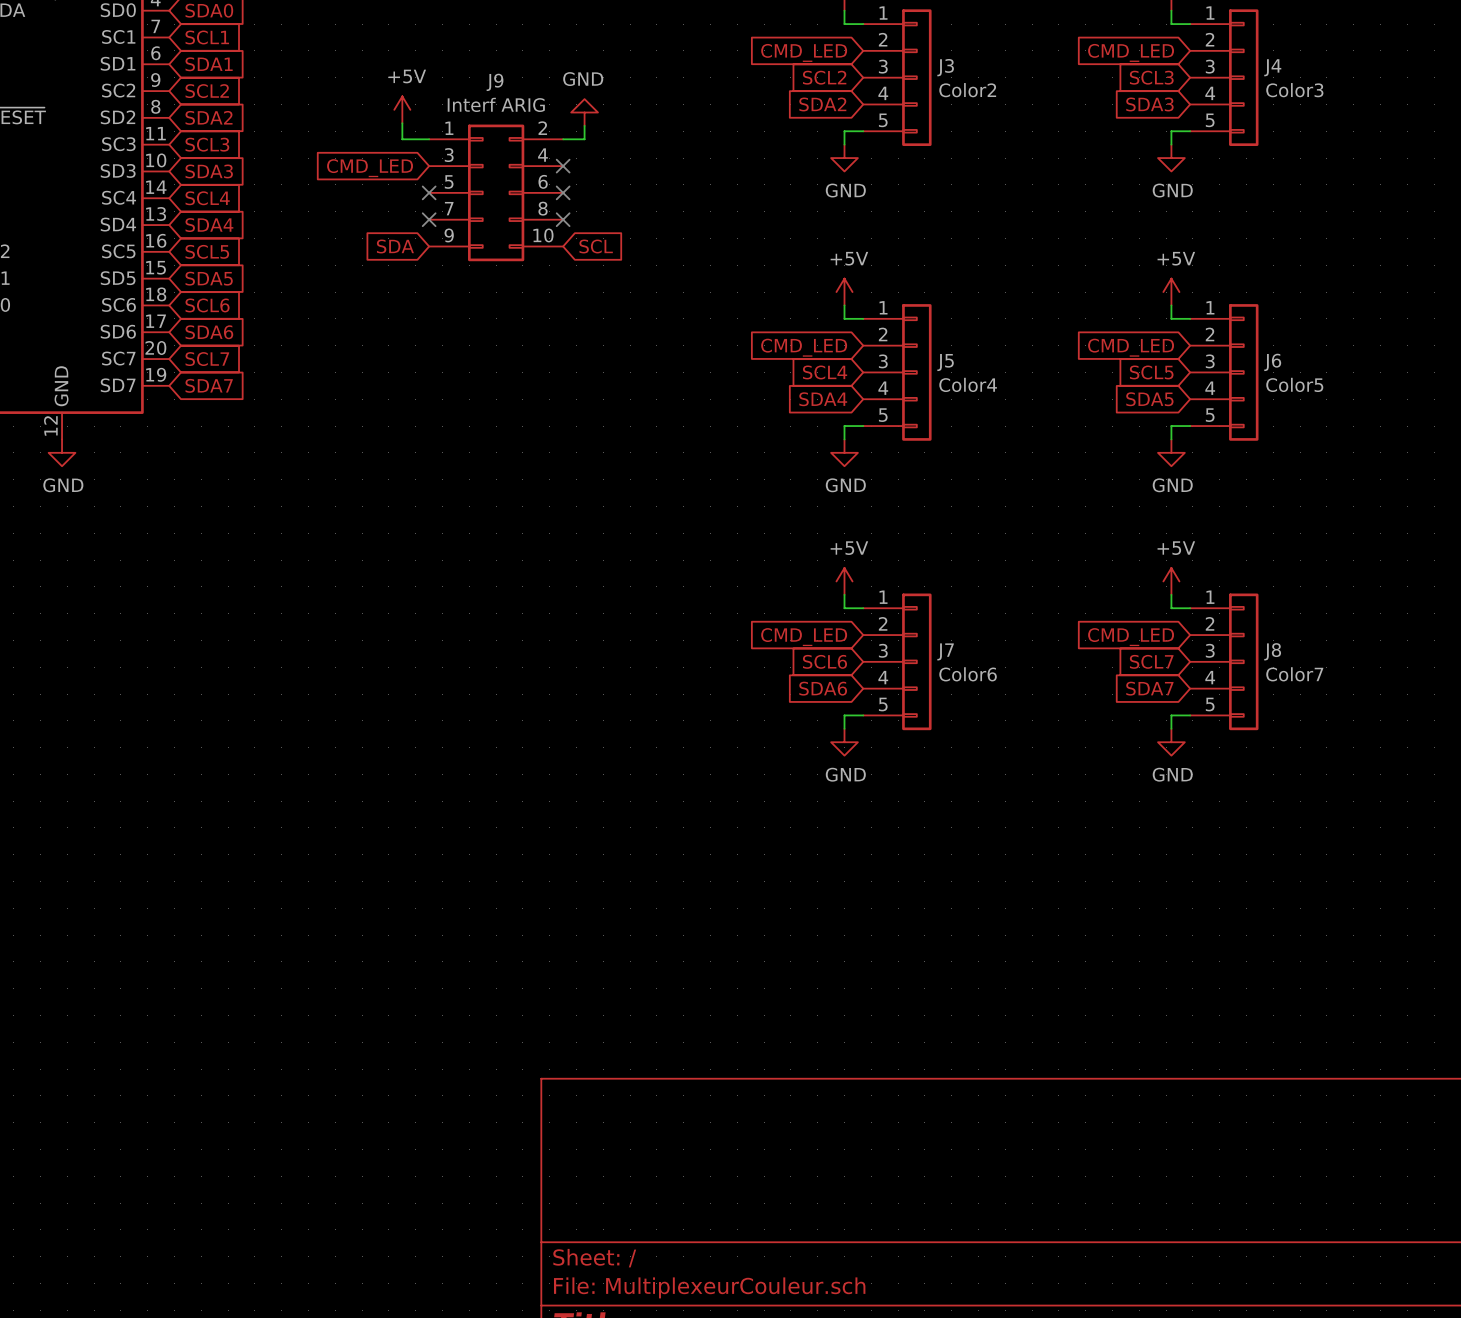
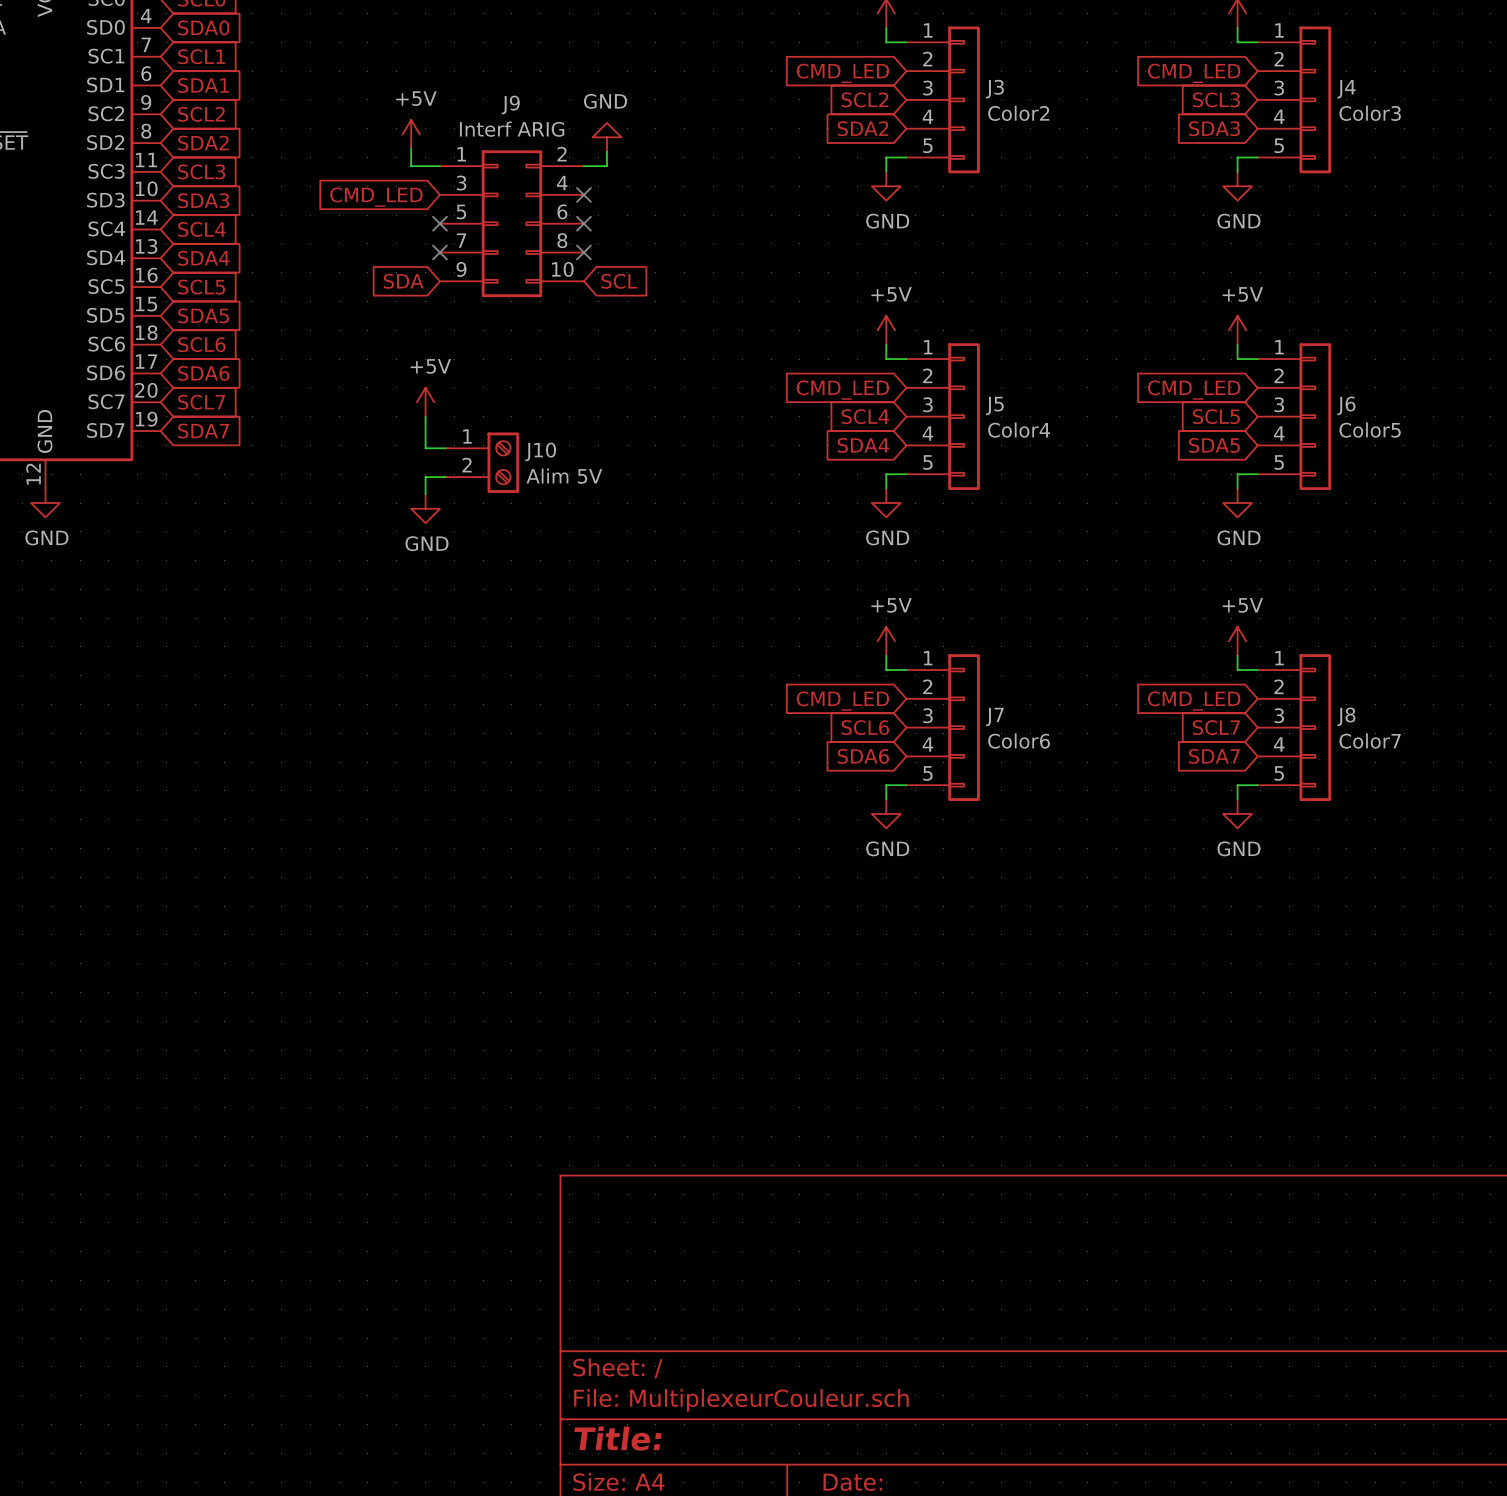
power symbol: none -> +5V (425, 402)
wire: none -> (425, 416) (425, 448) (445, 448)
J10: none -> Alim 5V (482, 462)
wire: none -> (445, 477) (425, 477) (425, 494)
power symbol: none -> GND (425, 508)

